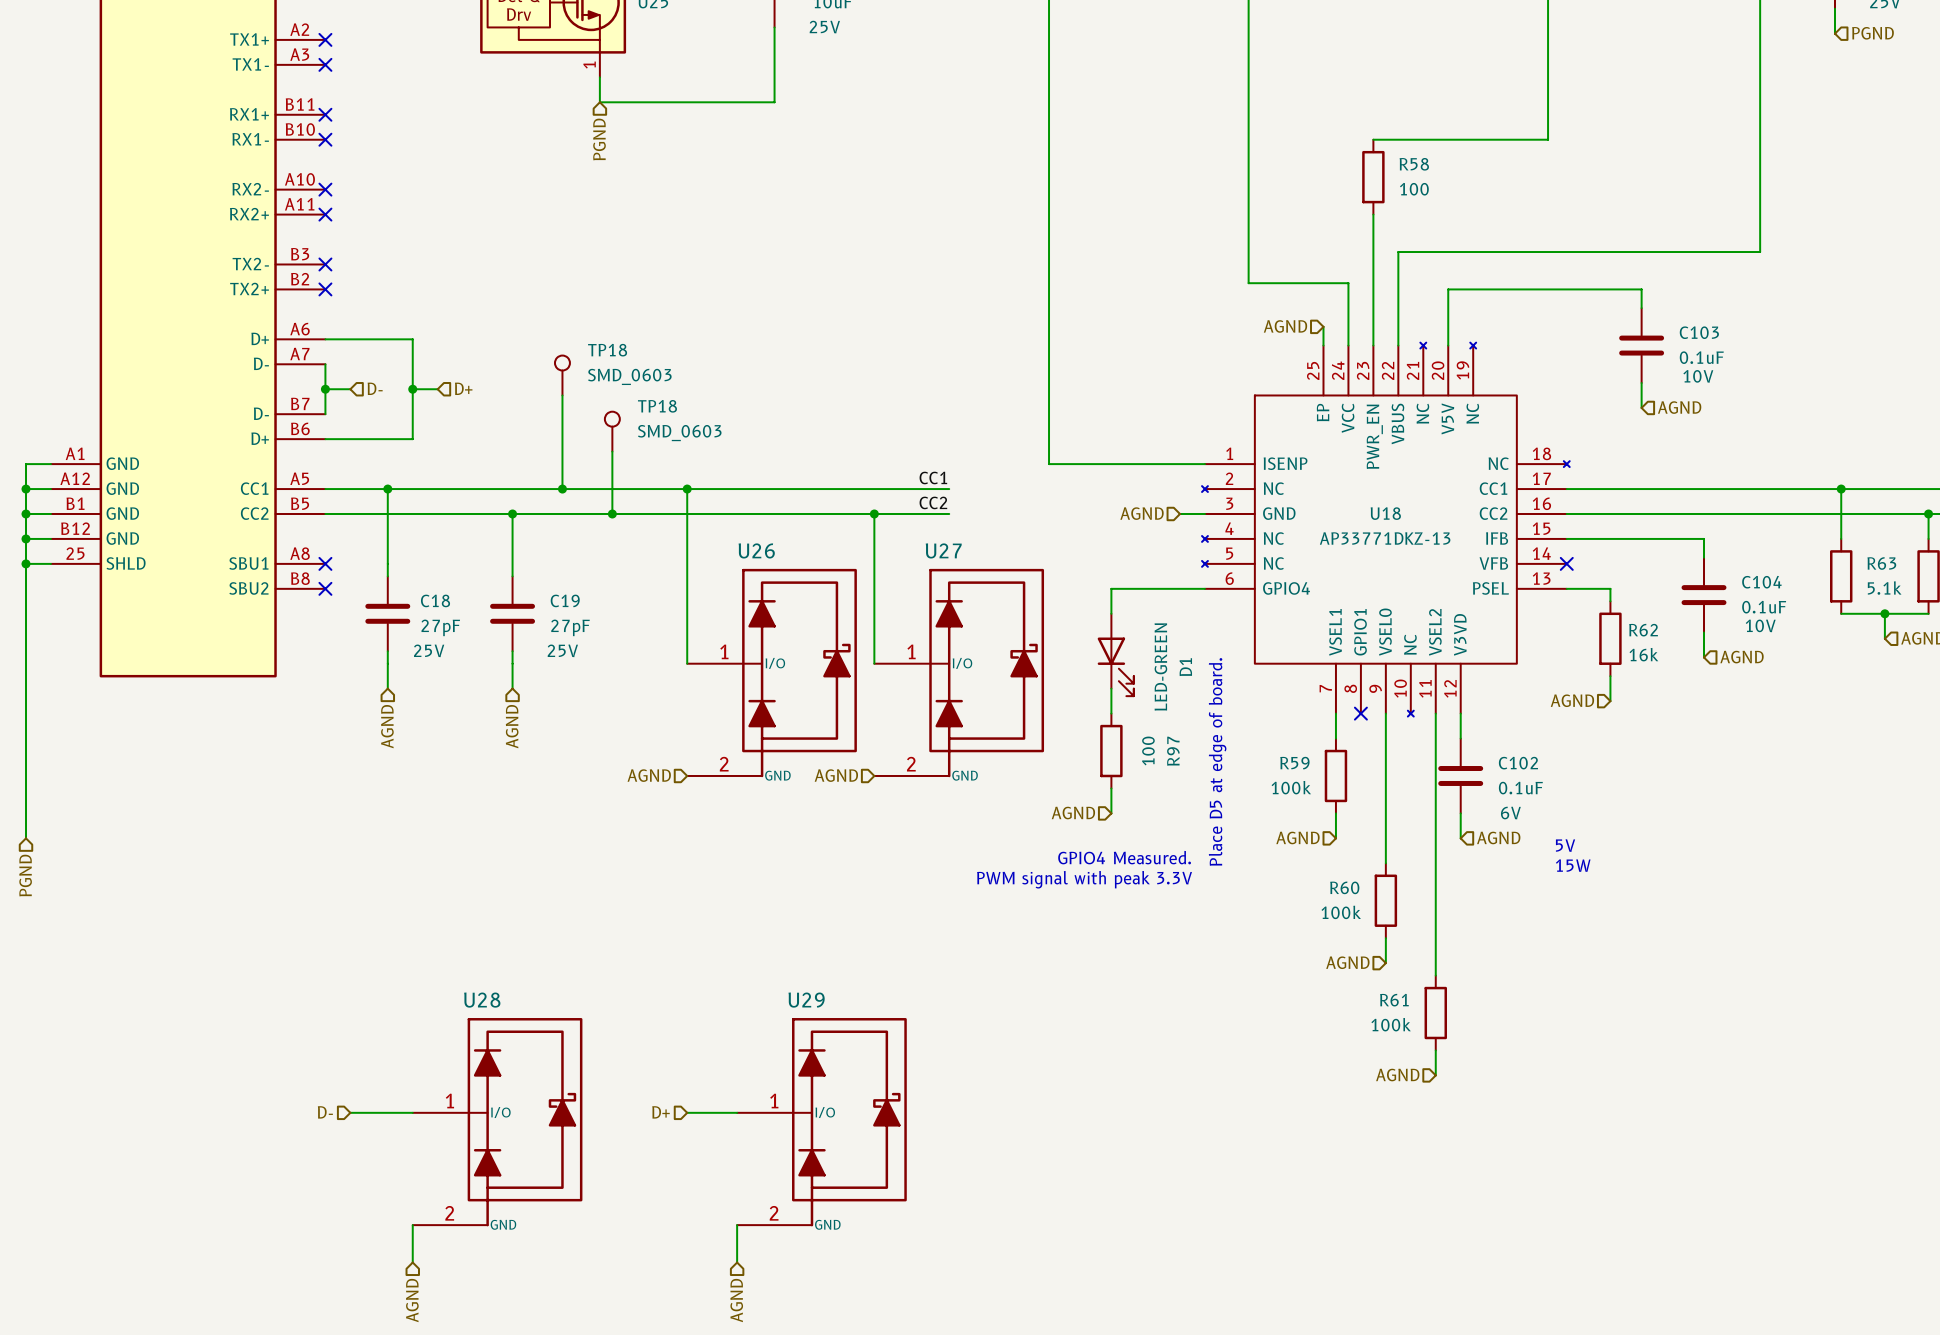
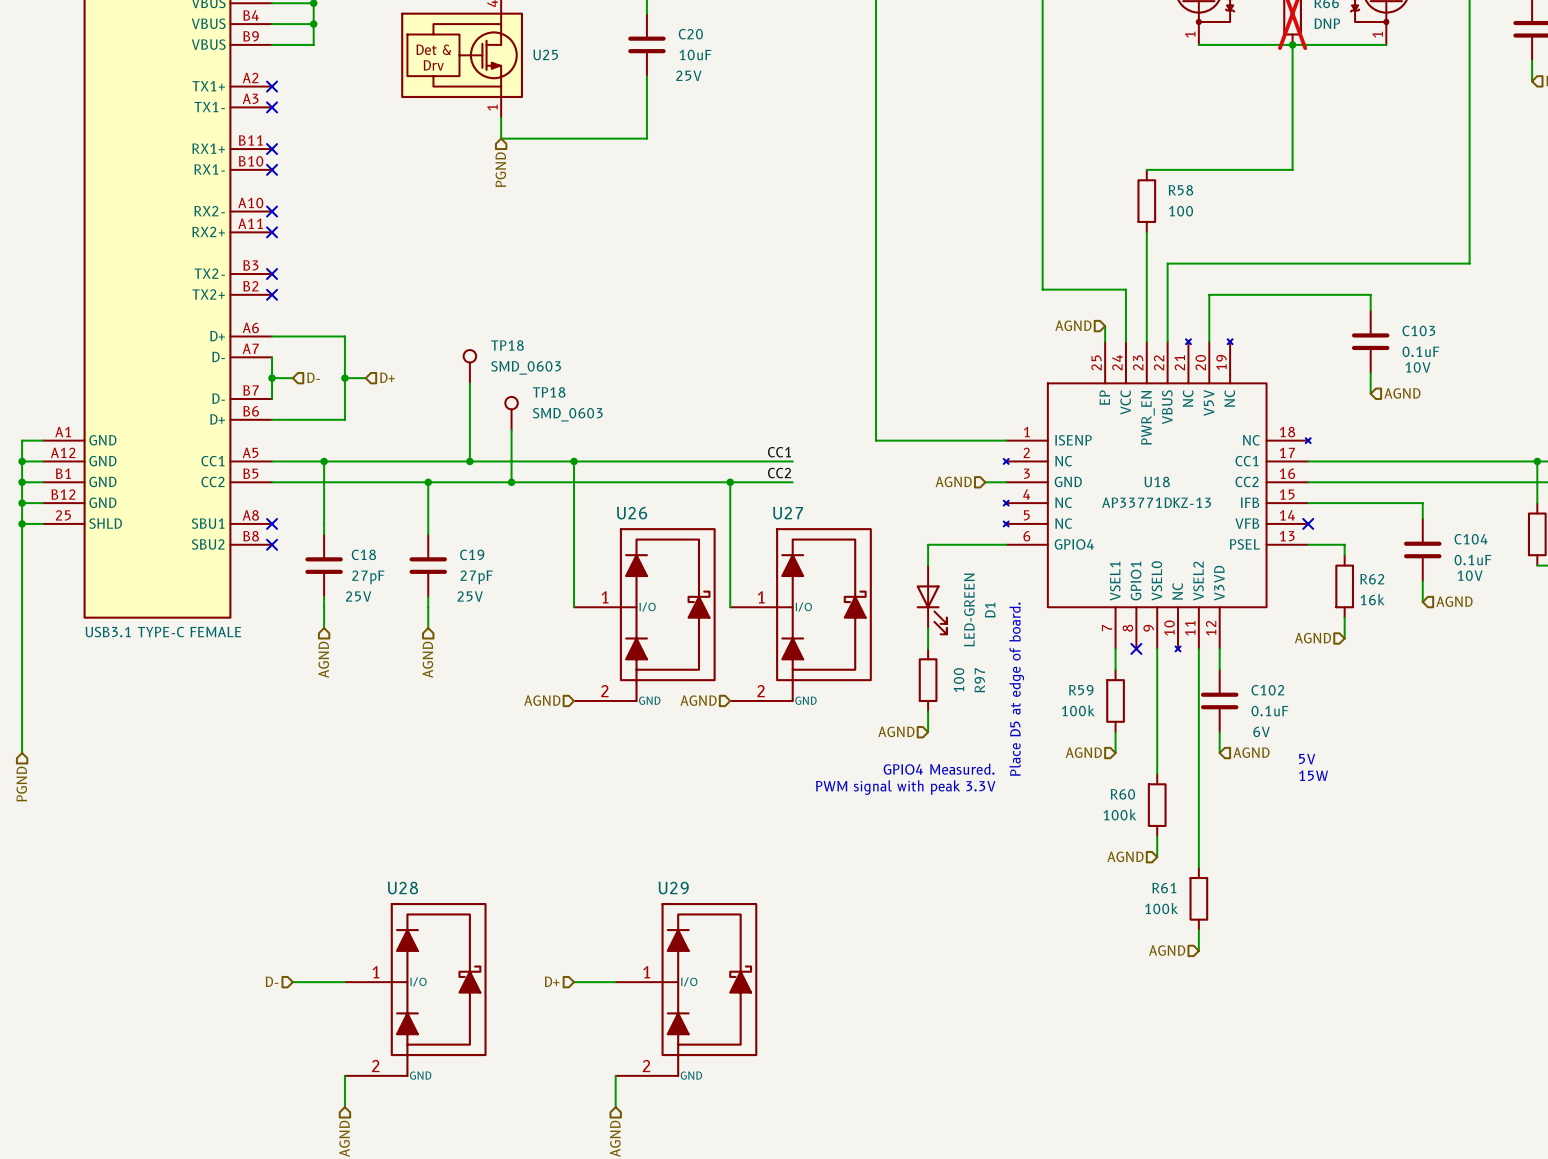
part text: none -> USB3.1 TYPE-C FEMALE (163, 632)

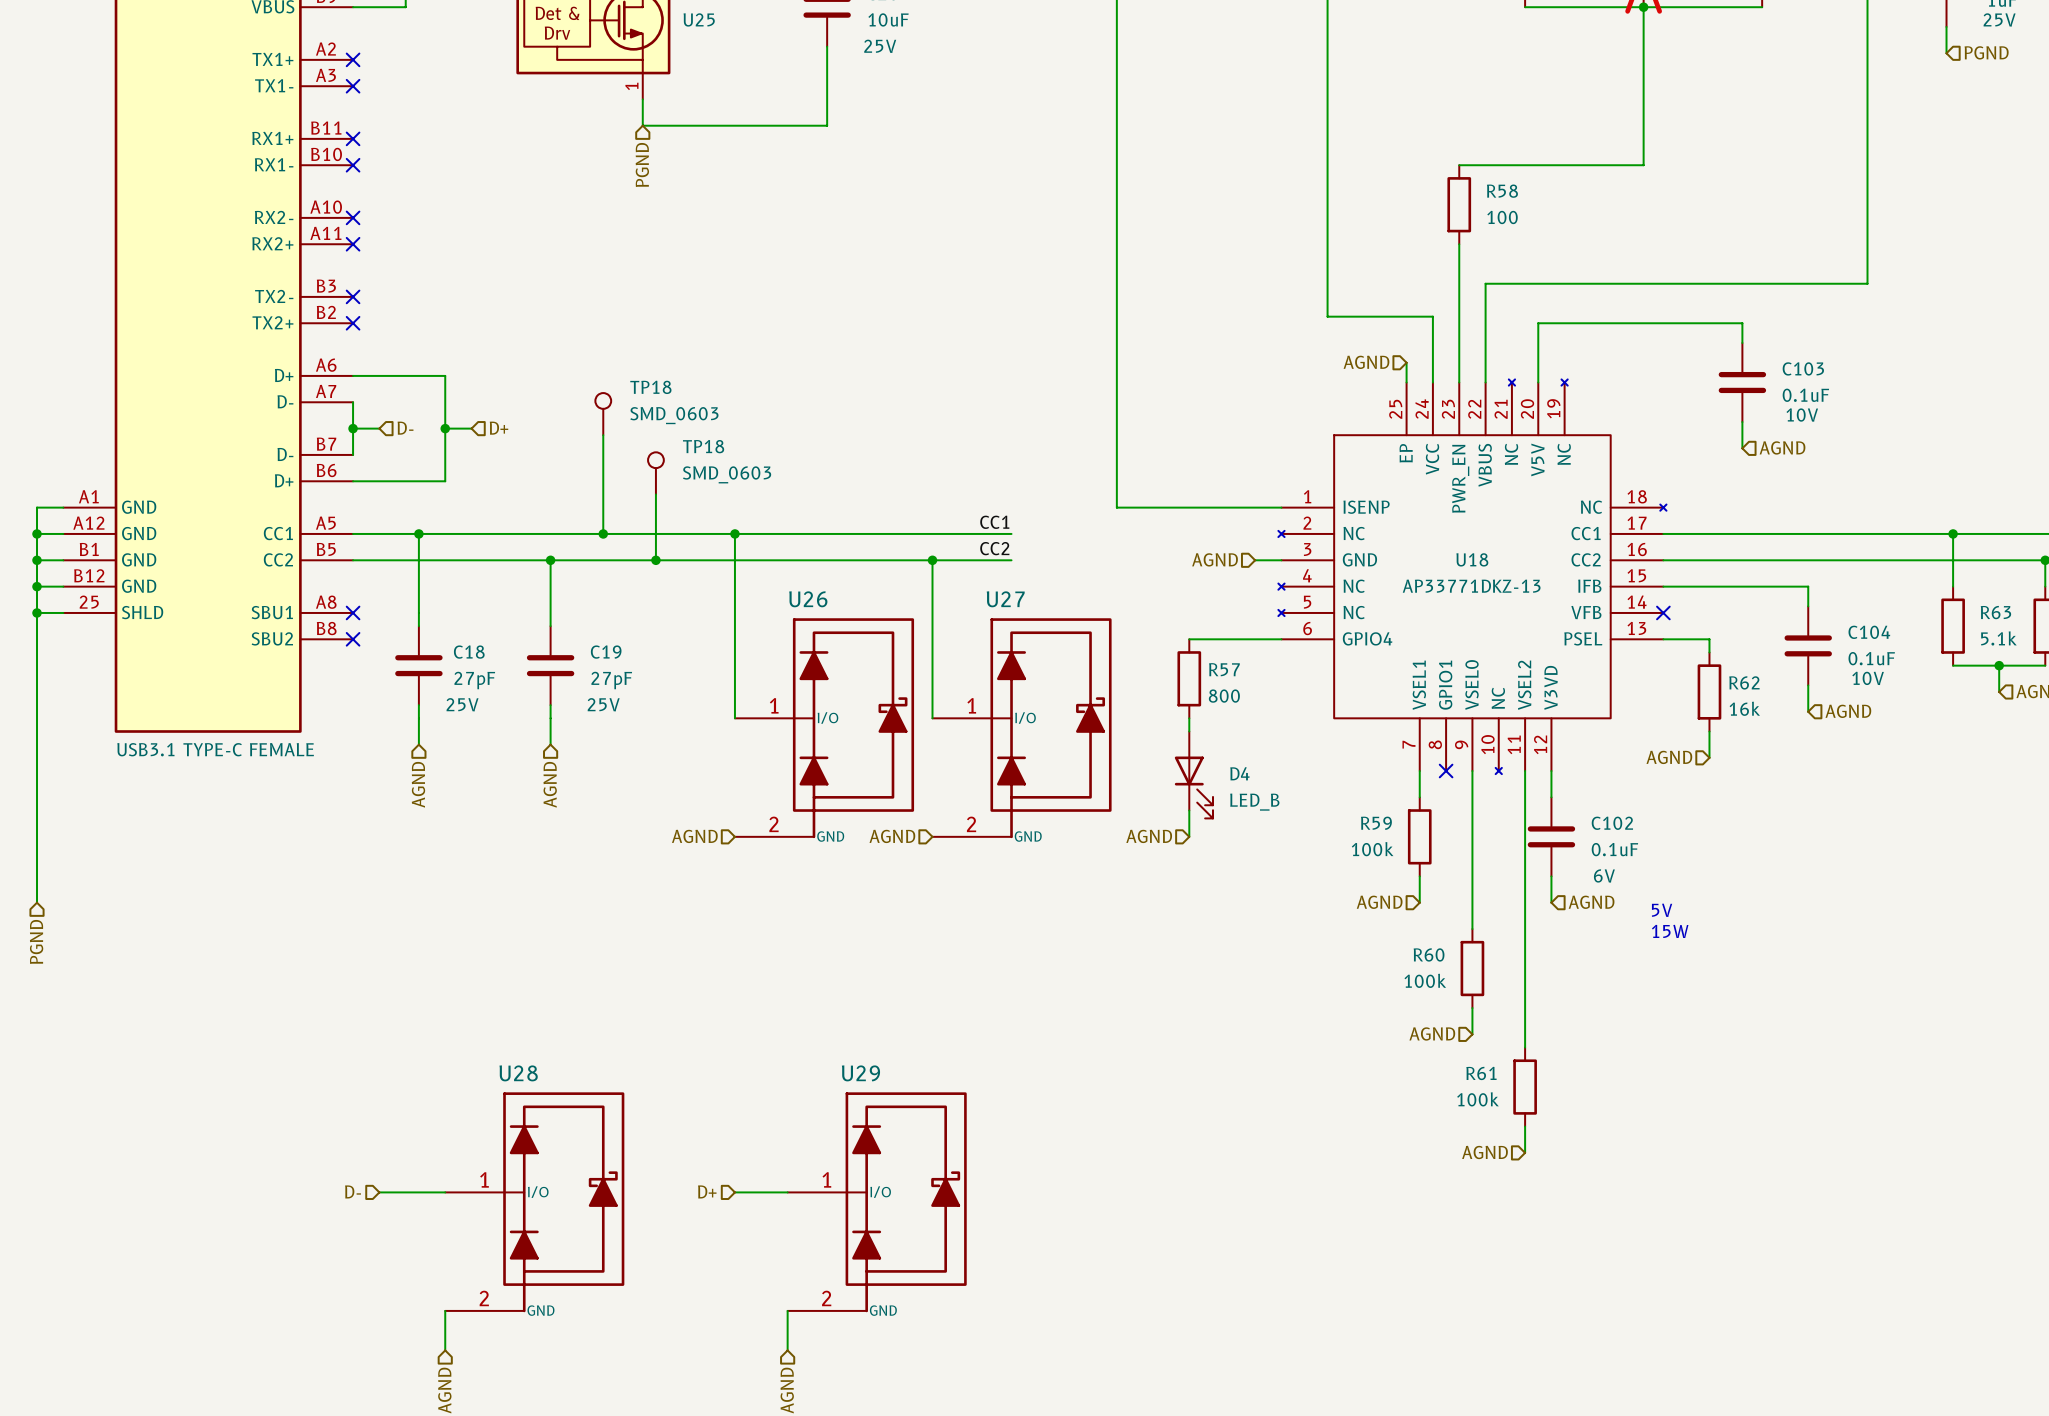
wire: (933, 544) (928, 544) (928, 565) -> none
R57: none -> 800 (1189, 678)
D1: LED-GREEN (931, 599) -> none
wire: none -> (1189, 718) (1189, 731)
wire: (928, 628) (928, 648) -> none
D4: none -> LED_B (1193, 774)
R97: 100 (928, 680) -> none
text: Place D5 at edge of board. (1016, 689) -> none
wire: (928, 711) (928, 732) -> (1189, 810) (1189, 836)
hierarchical label position: AGND (896, 731) -> AGND (1149, 836)
text: GPIO4 Measured. (939, 769) -> none
text: PWM signal with peak 3.3V (905, 787) -> none

